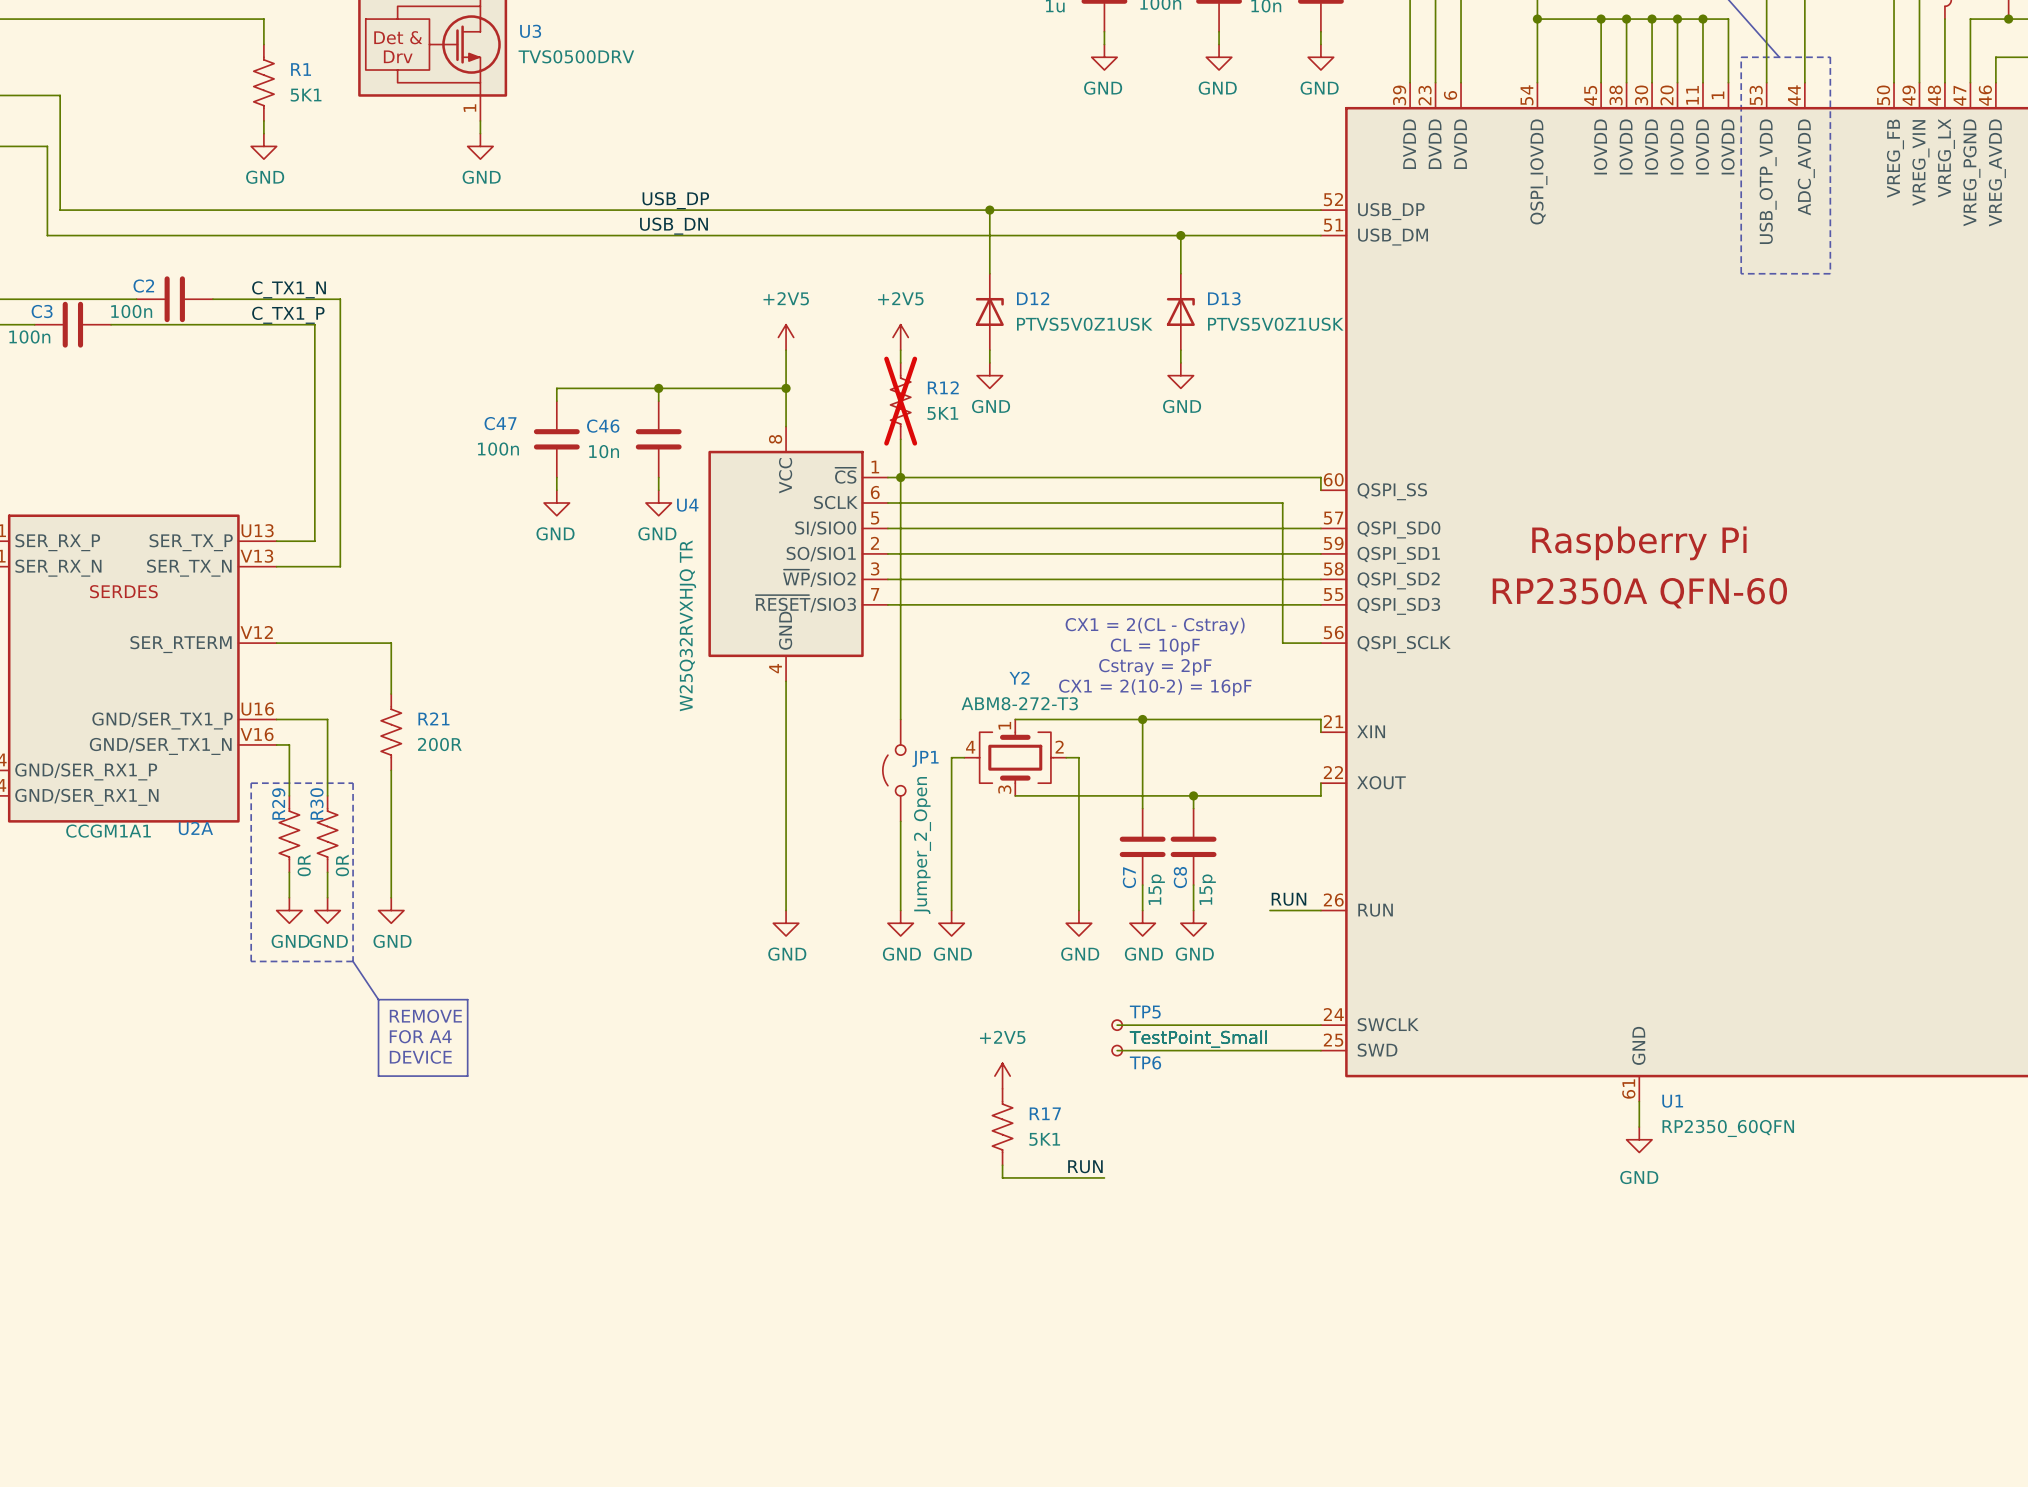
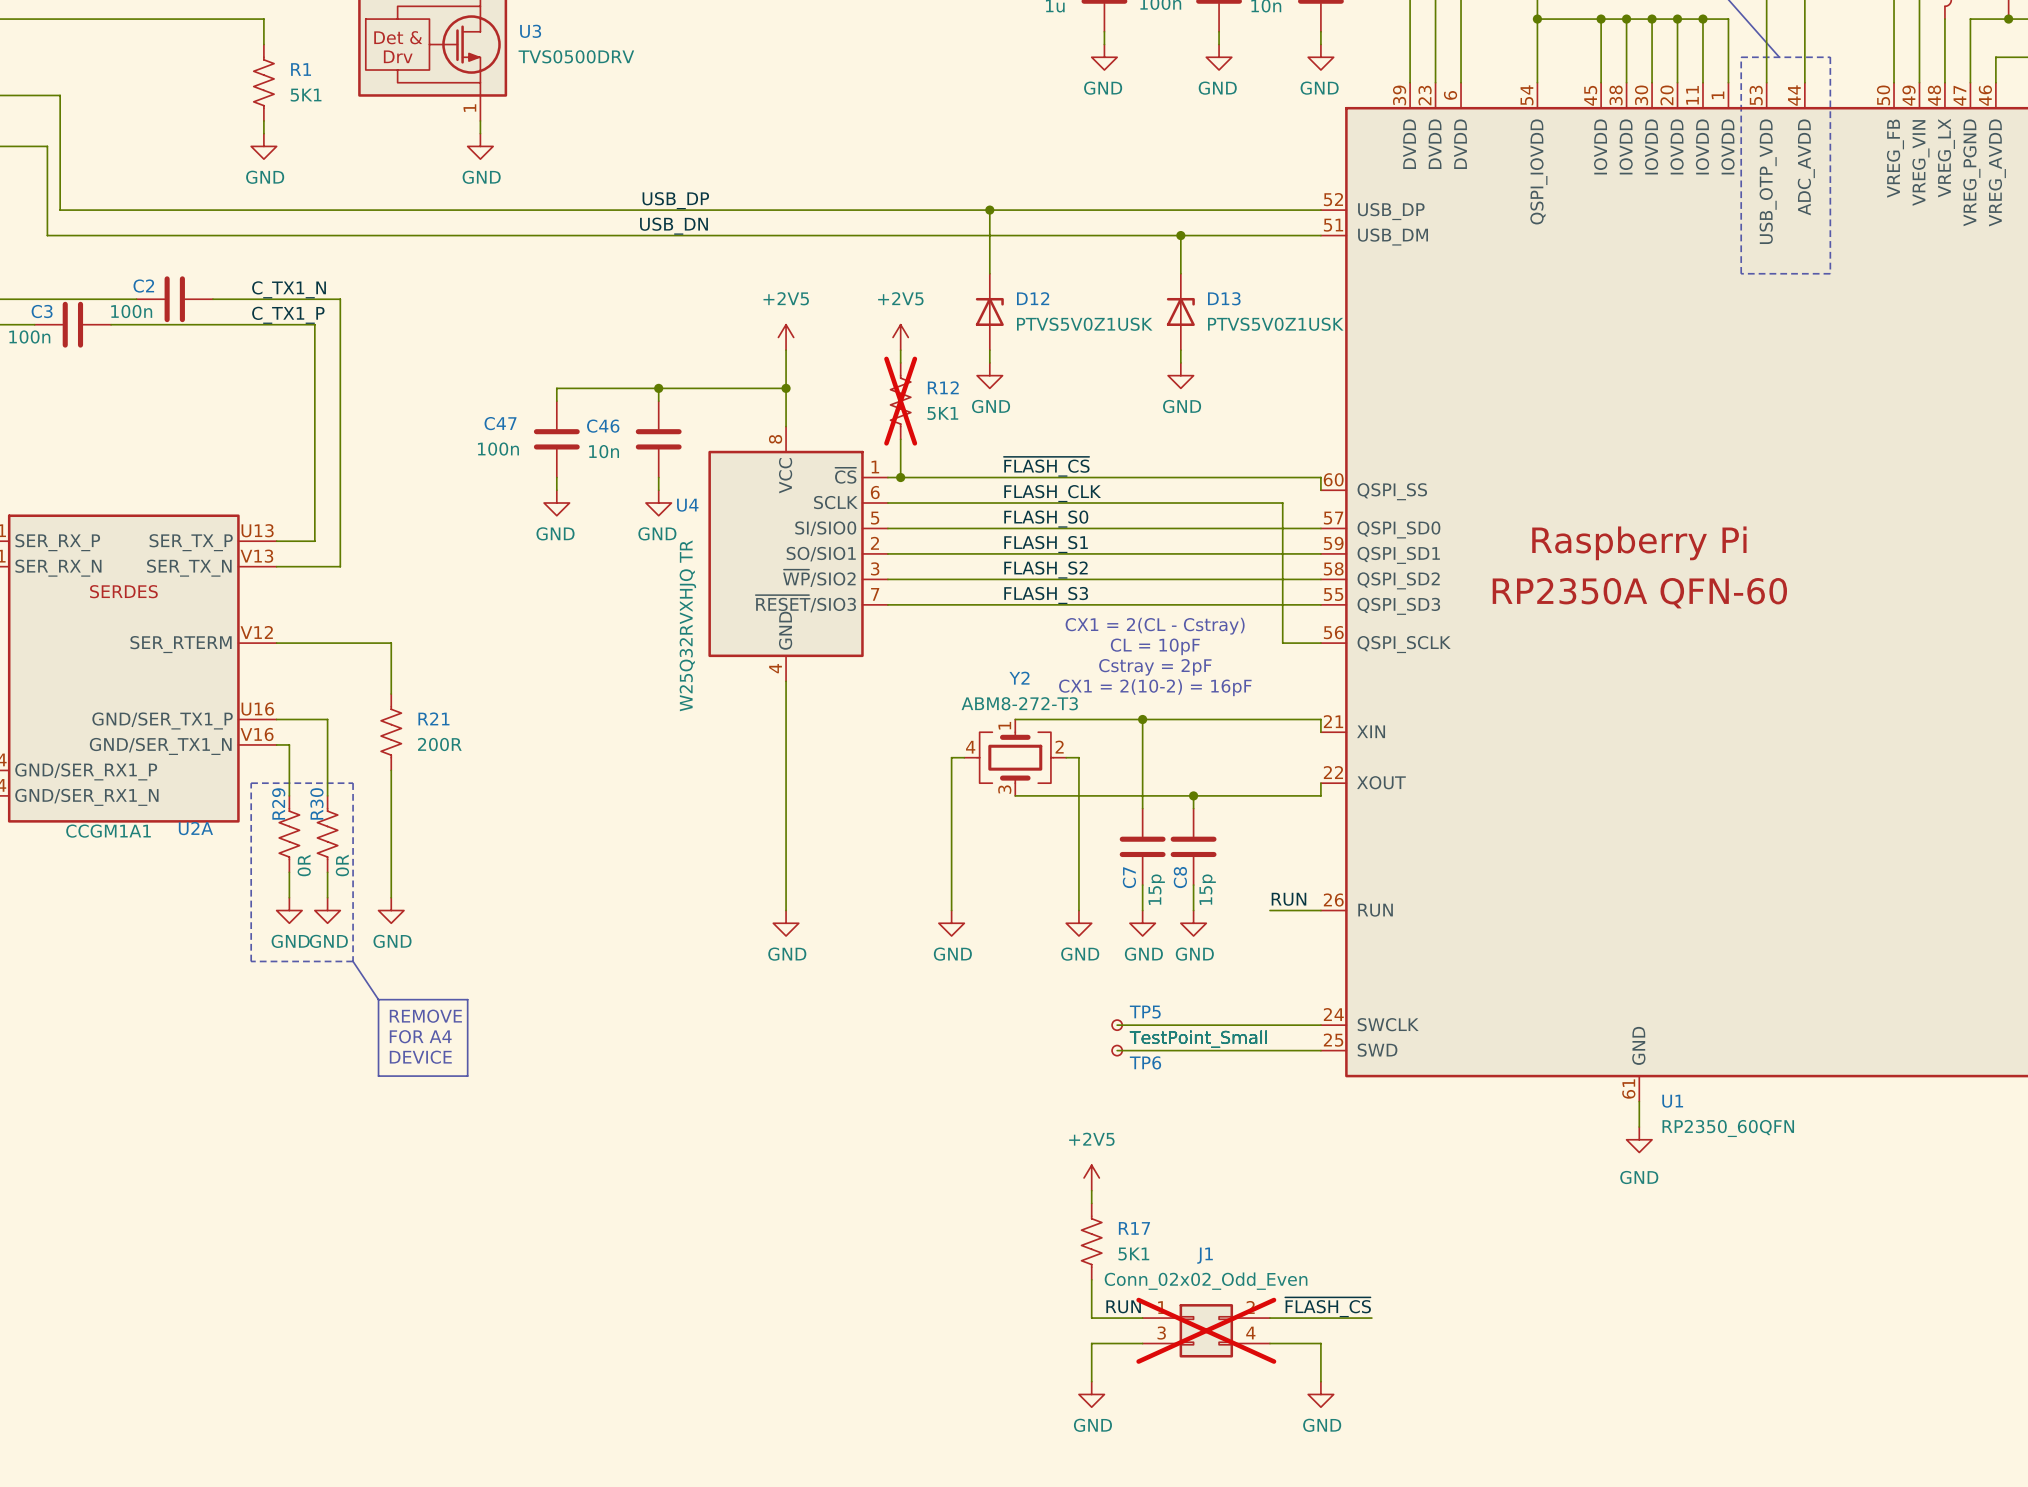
label: none -> ~{FLASH_CS} (1046, 466)
wire: (900, 477) (900, 719) -> none
label: none -> FLASH_CLK (1052, 493)
label: none -> FLASH_S0 (1046, 519)
label: none -> FLASH_S1 (1046, 544)
label: none -> FLASH_S2 (1045, 569)
label: none -> FLASH_S3 (1046, 595)
JP1: Jumper_2_Open (894, 770) -> none
wire: (900, 821) (900, 910) -> none
power symbol: GND (900, 923) -> none
power symbol position: +2V5 (1002, 1076) -> +2V5 (1091, 1177)
R17 position: (1002, 1127) -> (1091, 1241)
wire: (1002, 1165) (1002, 1177) (1104, 1177) -> none
label position: RUN (1085, 1166) -> RUN (1123, 1306)
wire: none -> (1091, 1190) (1091, 1203)
wire: none -> (1091, 1279) (1091, 1318) (1142, 1318)
label: none -> ~{FLASH_CS} (1328, 1307)
wire: none -> (1269, 1318) (1371, 1318)
J1: none -> Conn_02x02_Odd_Even (1206, 1330)
wire: none -> (1142, 1343) (1091, 1343) (1091, 1381)
wire: none -> (1269, 1343) (1320, 1343) (1320, 1381)
power symbol: none -> GND (1091, 1394)
power symbol: none -> GND (1320, 1394)

